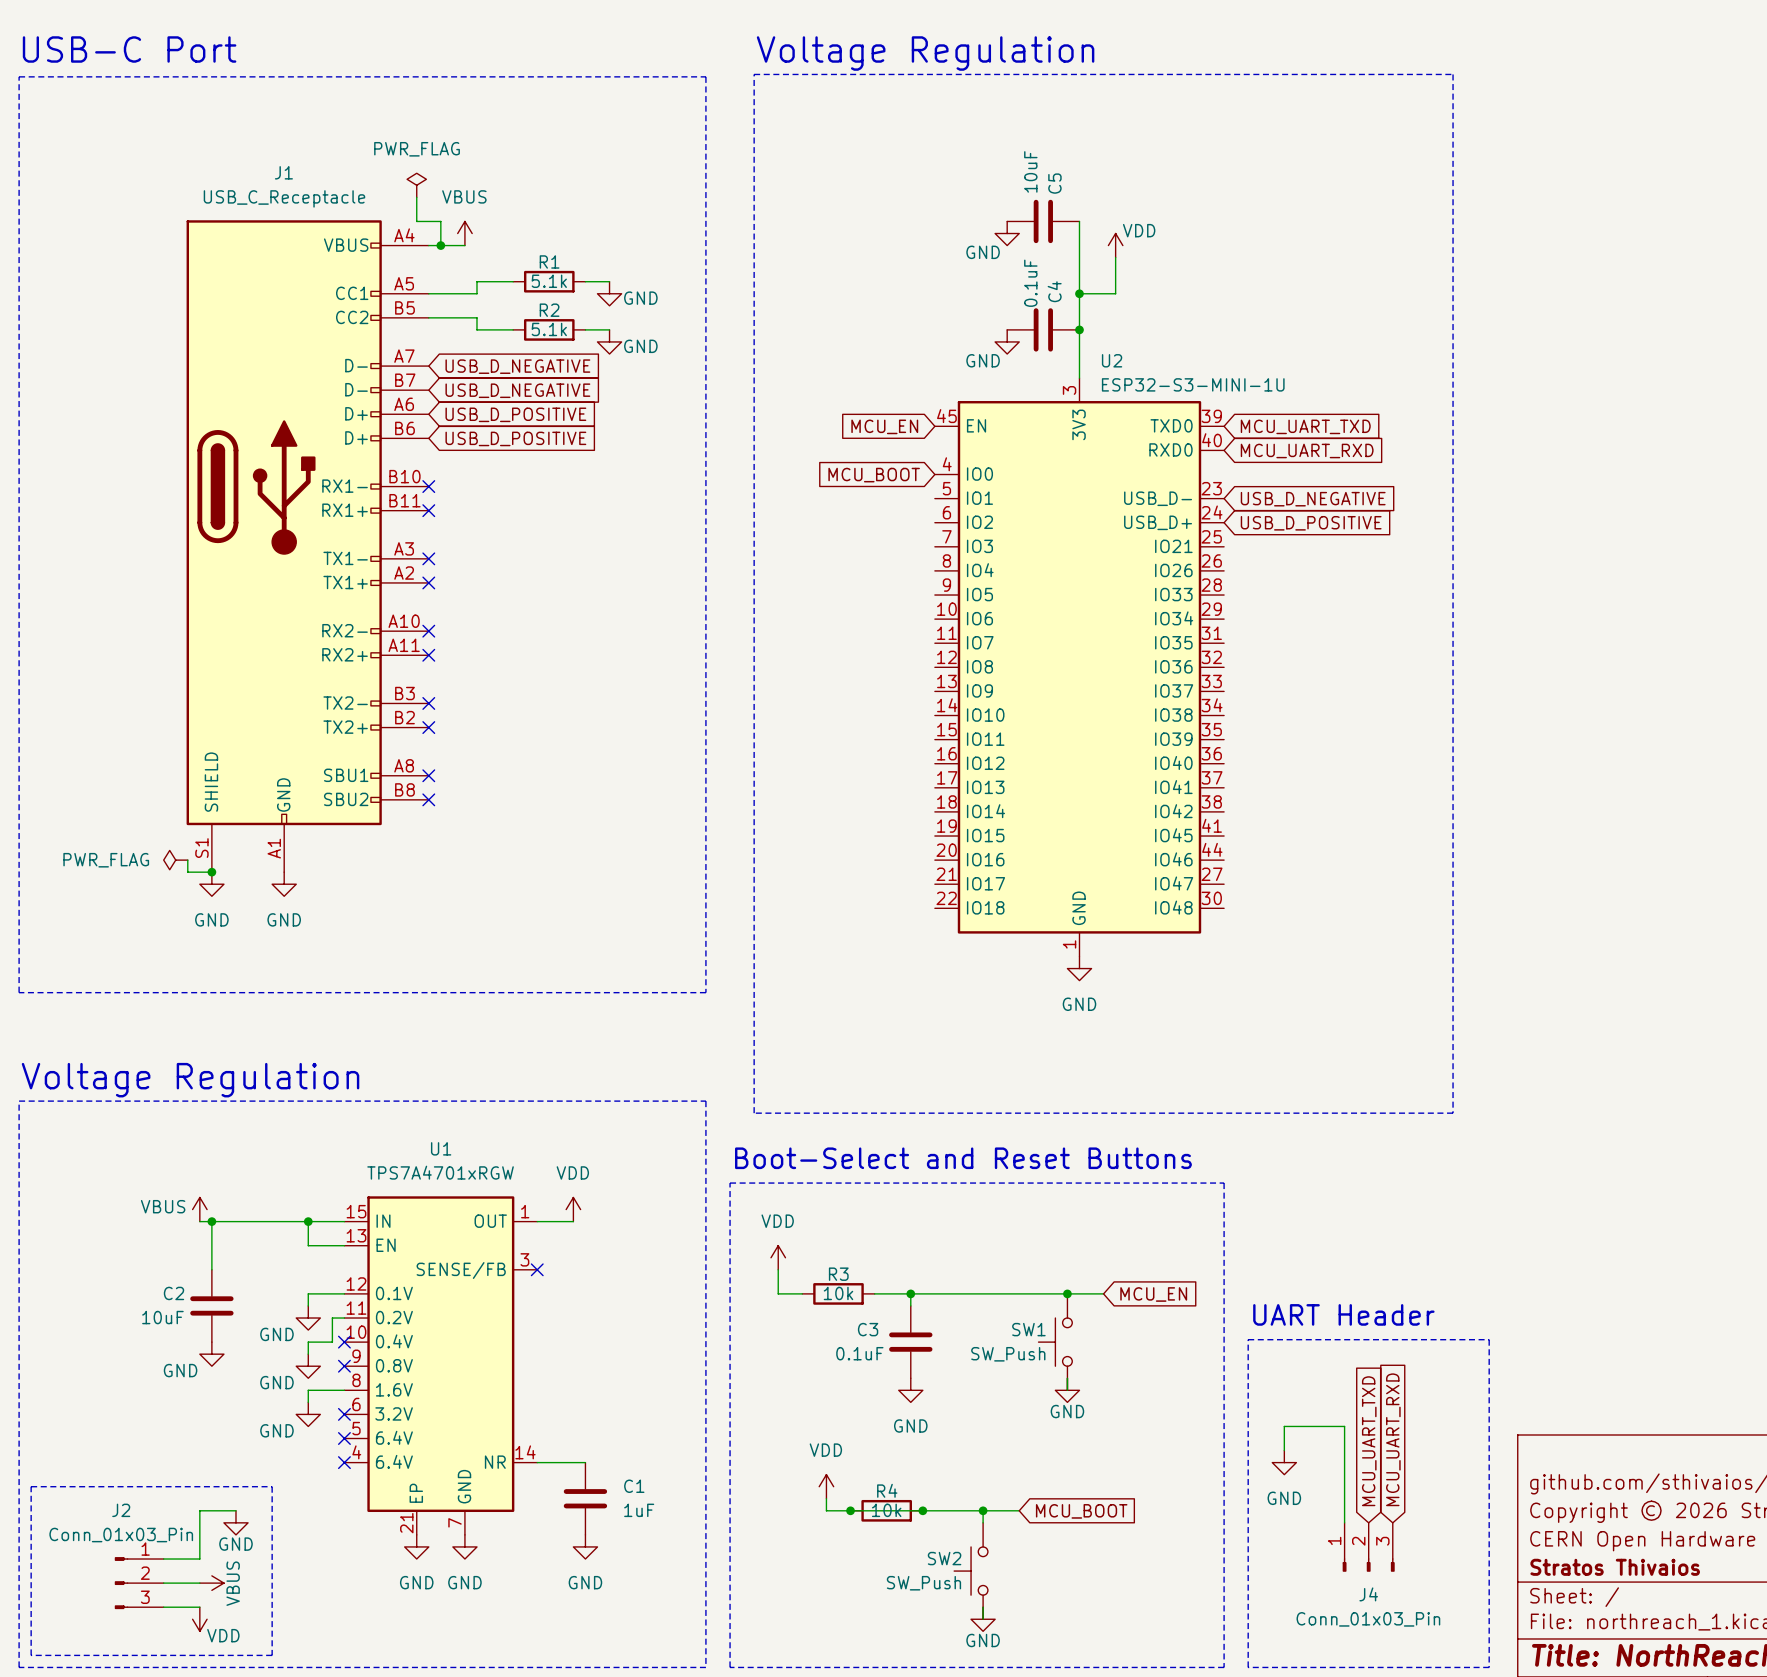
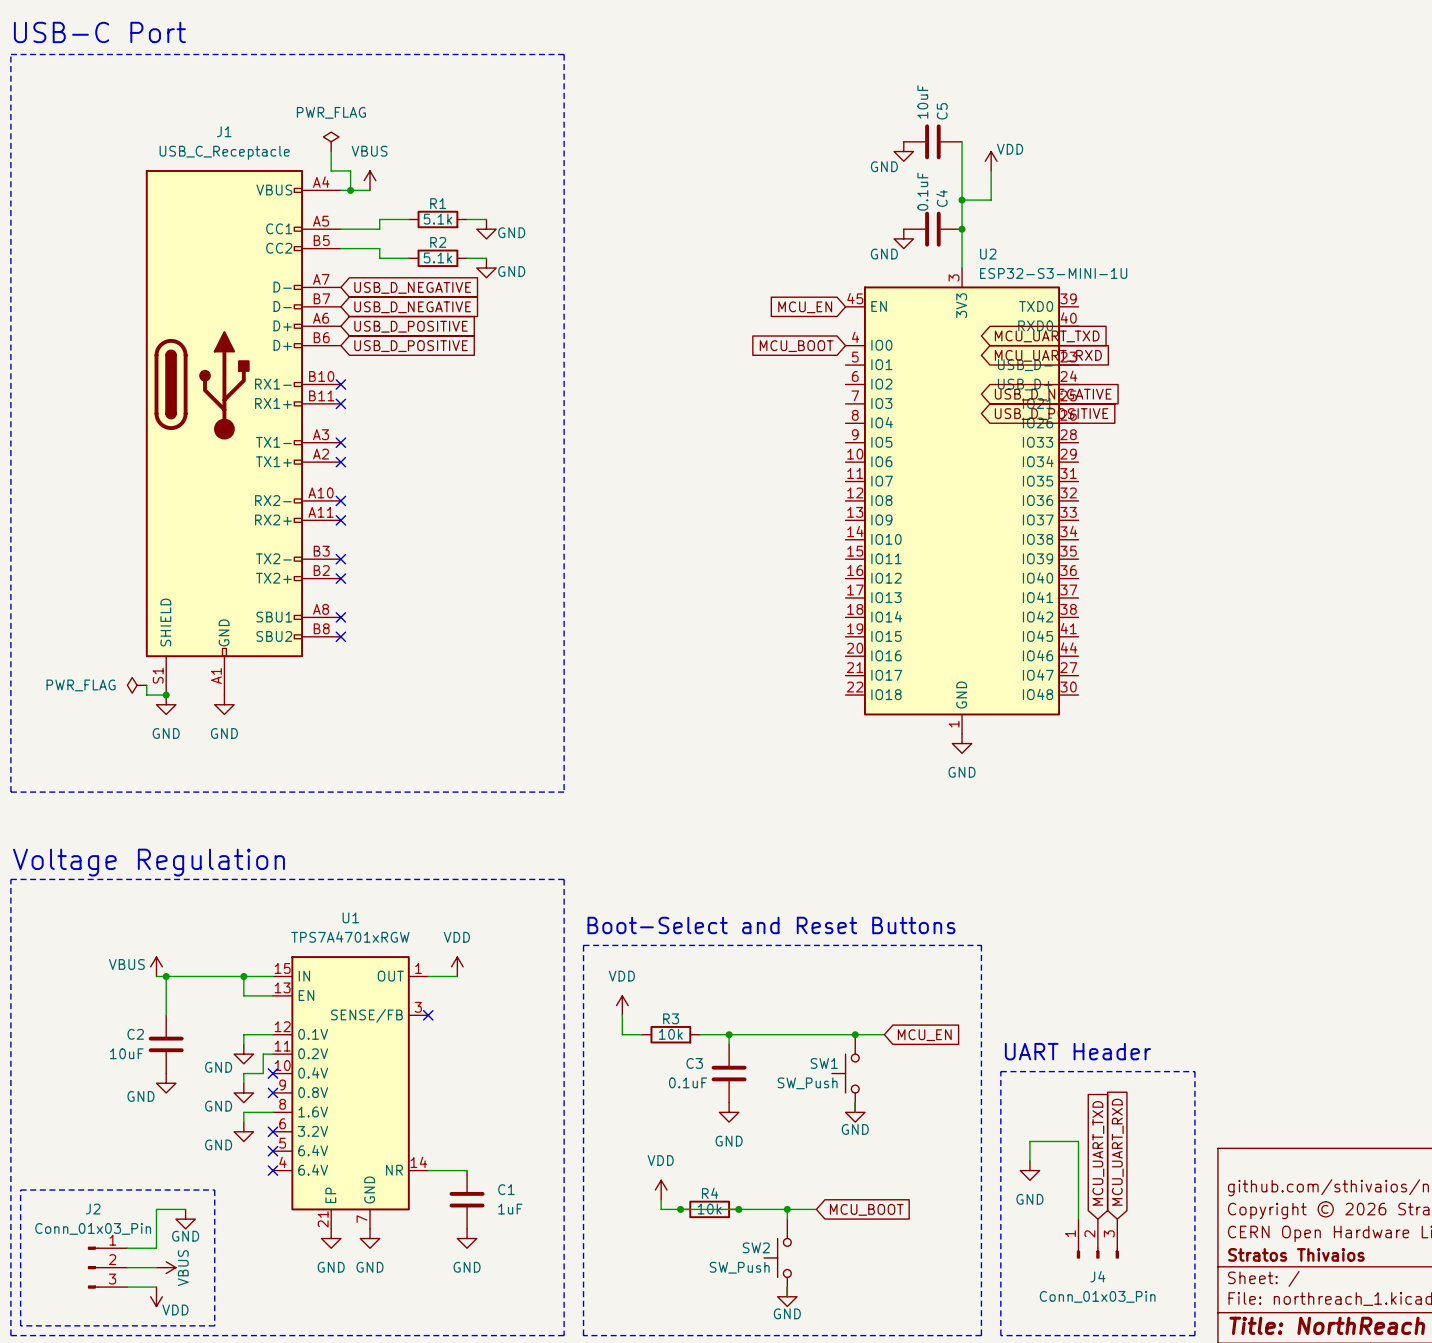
text: Voltage Regulation (925, 53) -> none
line: (754, 74) (1453, 74) (1453, 1113) (754, 1113) (754, 74) -> none
power symbol: none -> GND (903, 151)
C5 position: (1043, 221) -> (932, 141)
wire: (1079, 221) (1079, 378) -> (962, 141) (962, 268)
power symbol: GND (1007, 233) -> none
power symbol position: VDD (1115, 245) -> VDD (991, 161)
wire: (1115, 257) (1115, 293) (1079, 293) -> (991, 170) (991, 200) (962, 200)
junction: none -> (962, 200)
junction: (1079, 293) -> none
junction: none -> (962, 229)
power symbol: none -> GND (903, 238)
C4 position: (1043, 329) -> (932, 229)
junction: (1079, 329) -> none
power symbol: GND (1007, 341) -> none
global label position: MCU_EN (884, 426) -> MCU_EN (805, 307)
global label position: MCU_BOOT (874, 475) -> MCU_BOOT (796, 346)
U2 position: (1079, 667) -> (962, 500)
power symbol position: GND (1079, 968) -> GND (962, 743)

